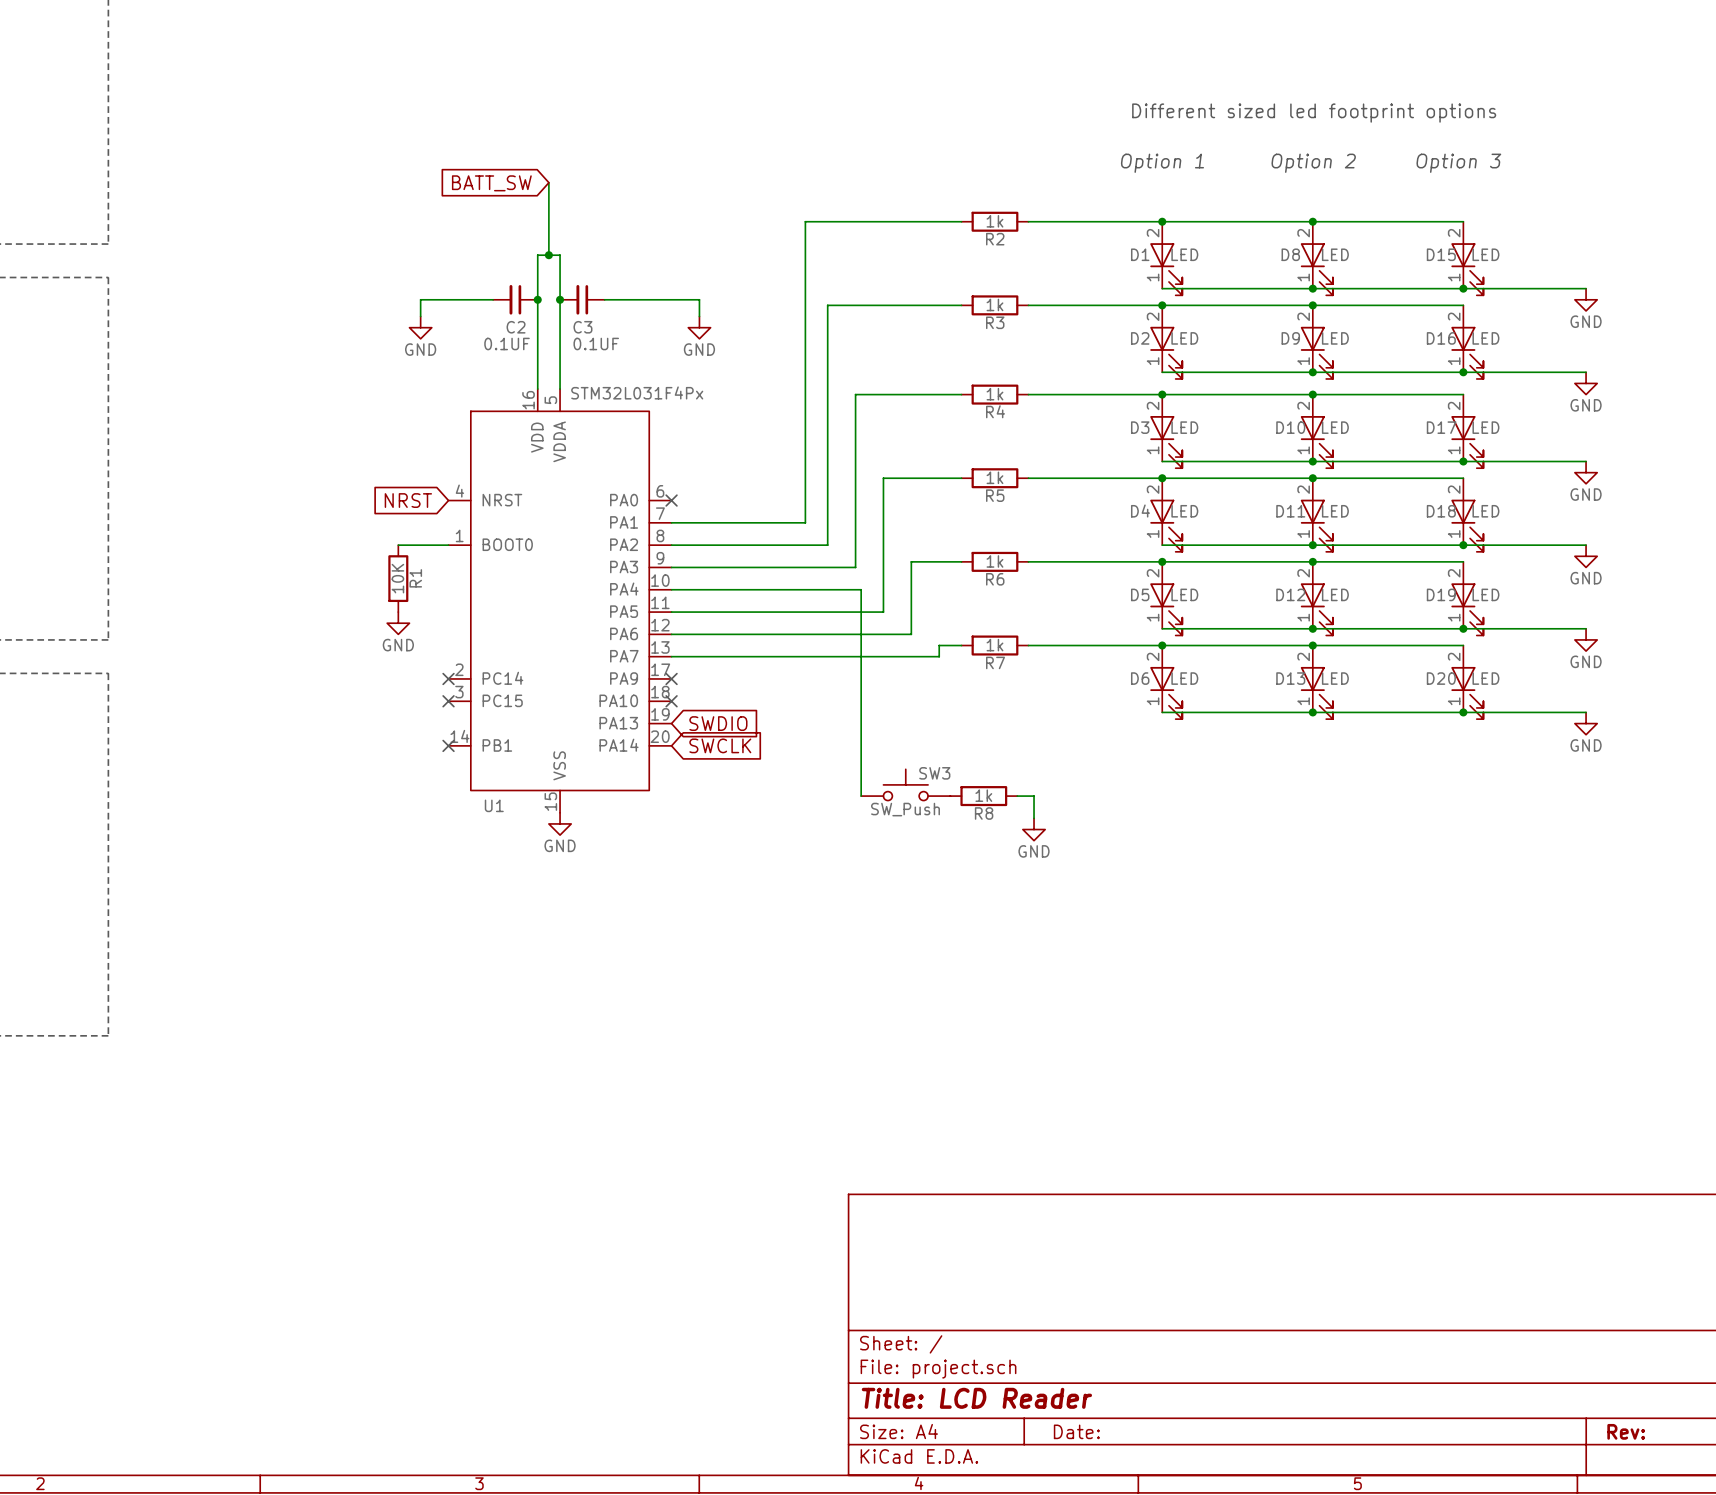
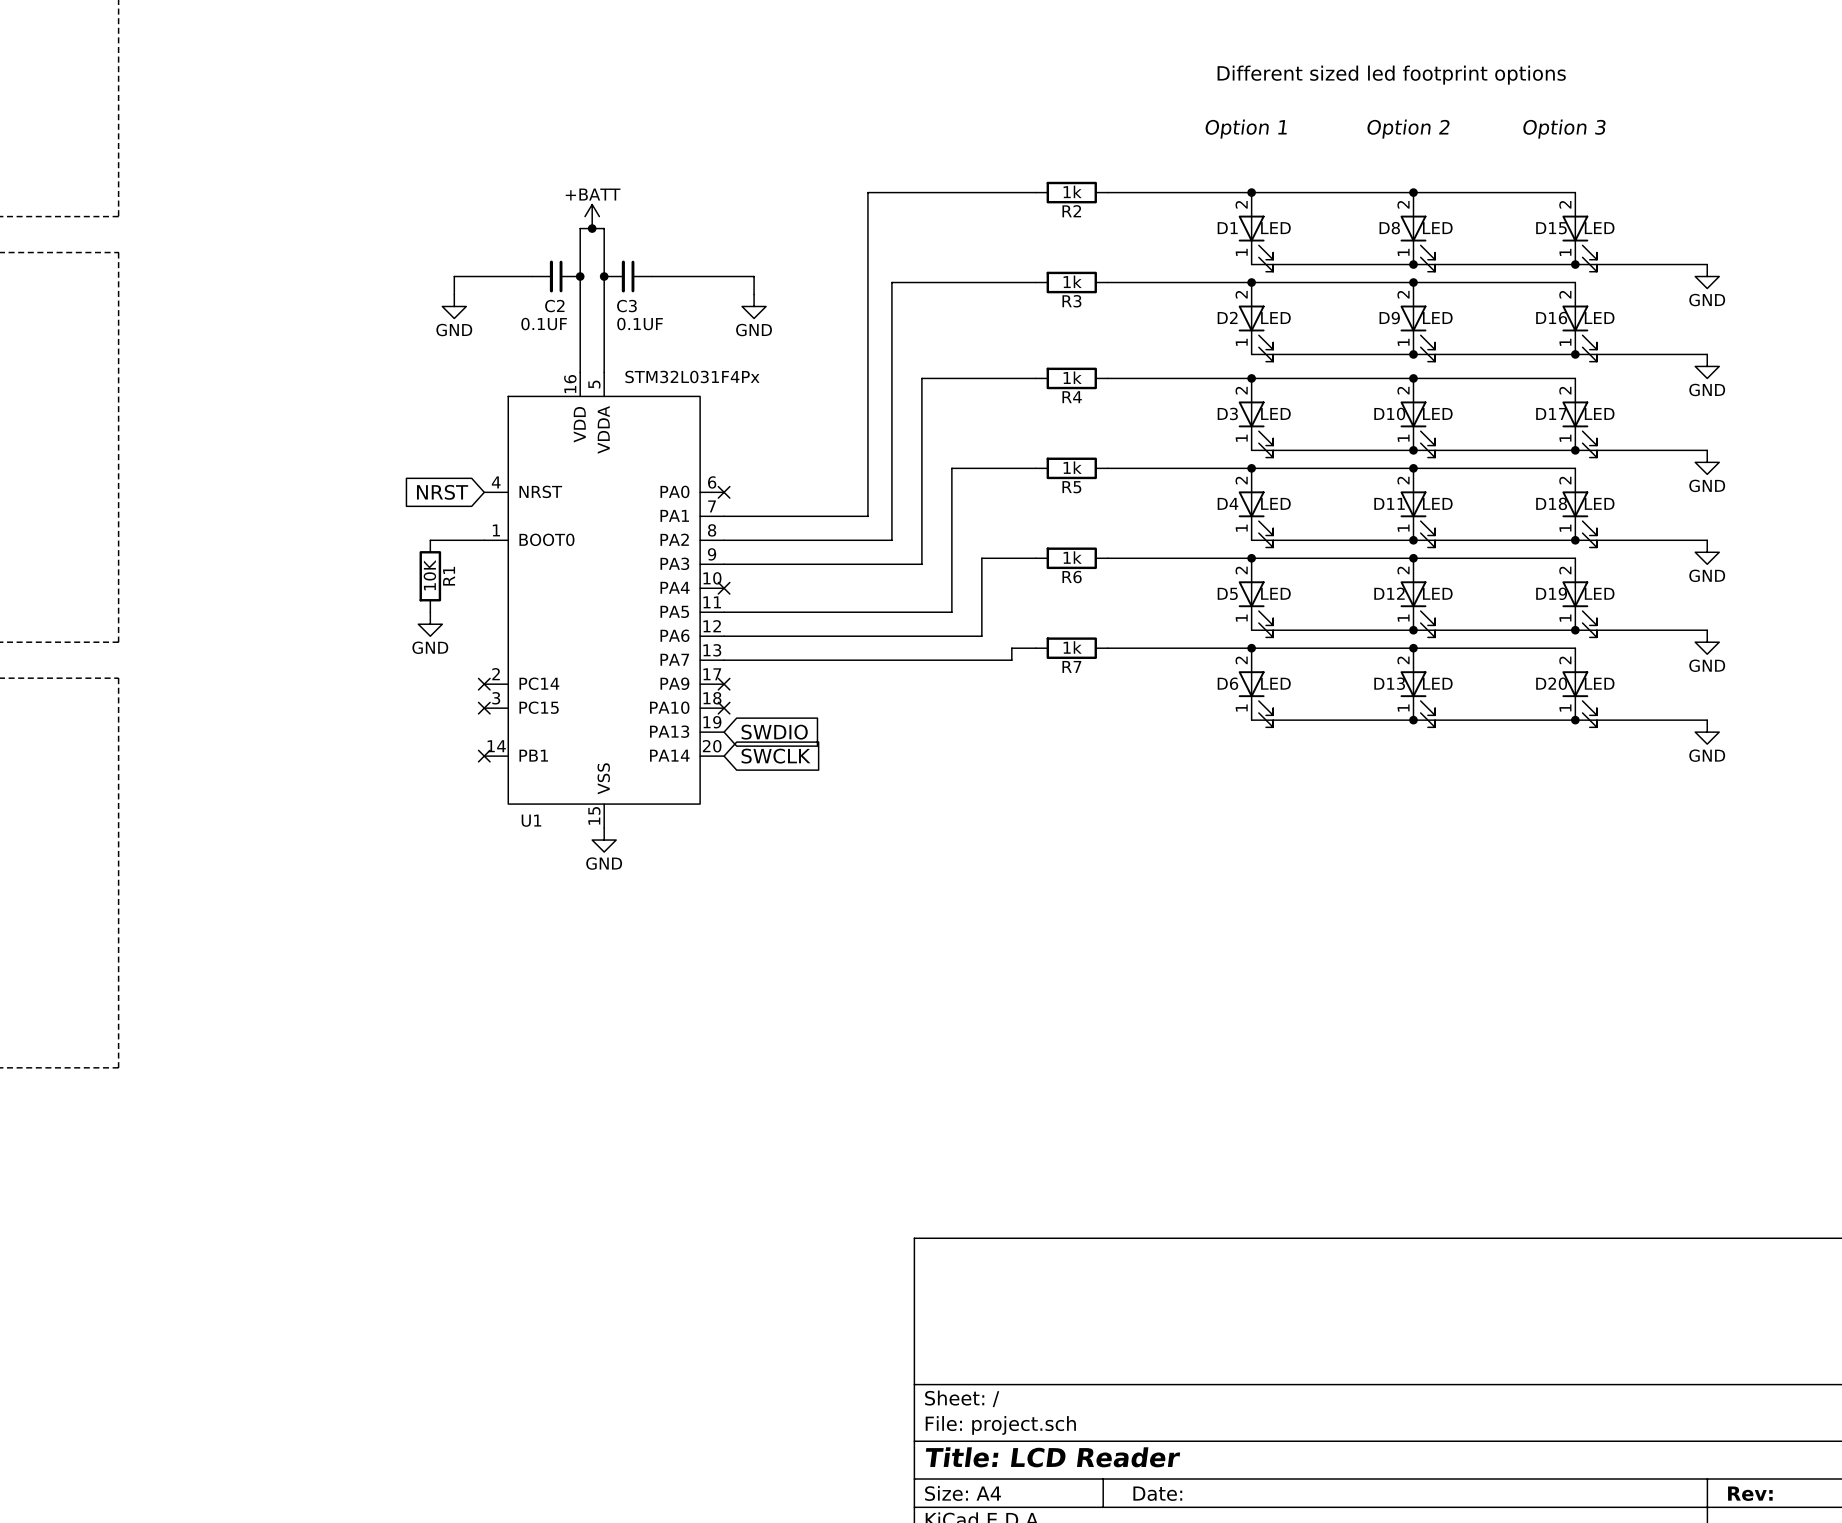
wire: (548, 182) (548, 255) -> none
global label: BATT_SW (491, 183) -> none
power symbol: none -> +BATT (592, 216)
wire: (671, 589) (861, 589) (861, 796) -> none
no-connect mark: none -> (724, 588)
SW3: SW_Push (905, 784) -> none
R8: 1k (983, 796) -> none
wire: (1017, 796) (1034, 796) (1034, 818) -> none
power symbol: GND (1034, 829) -> none

